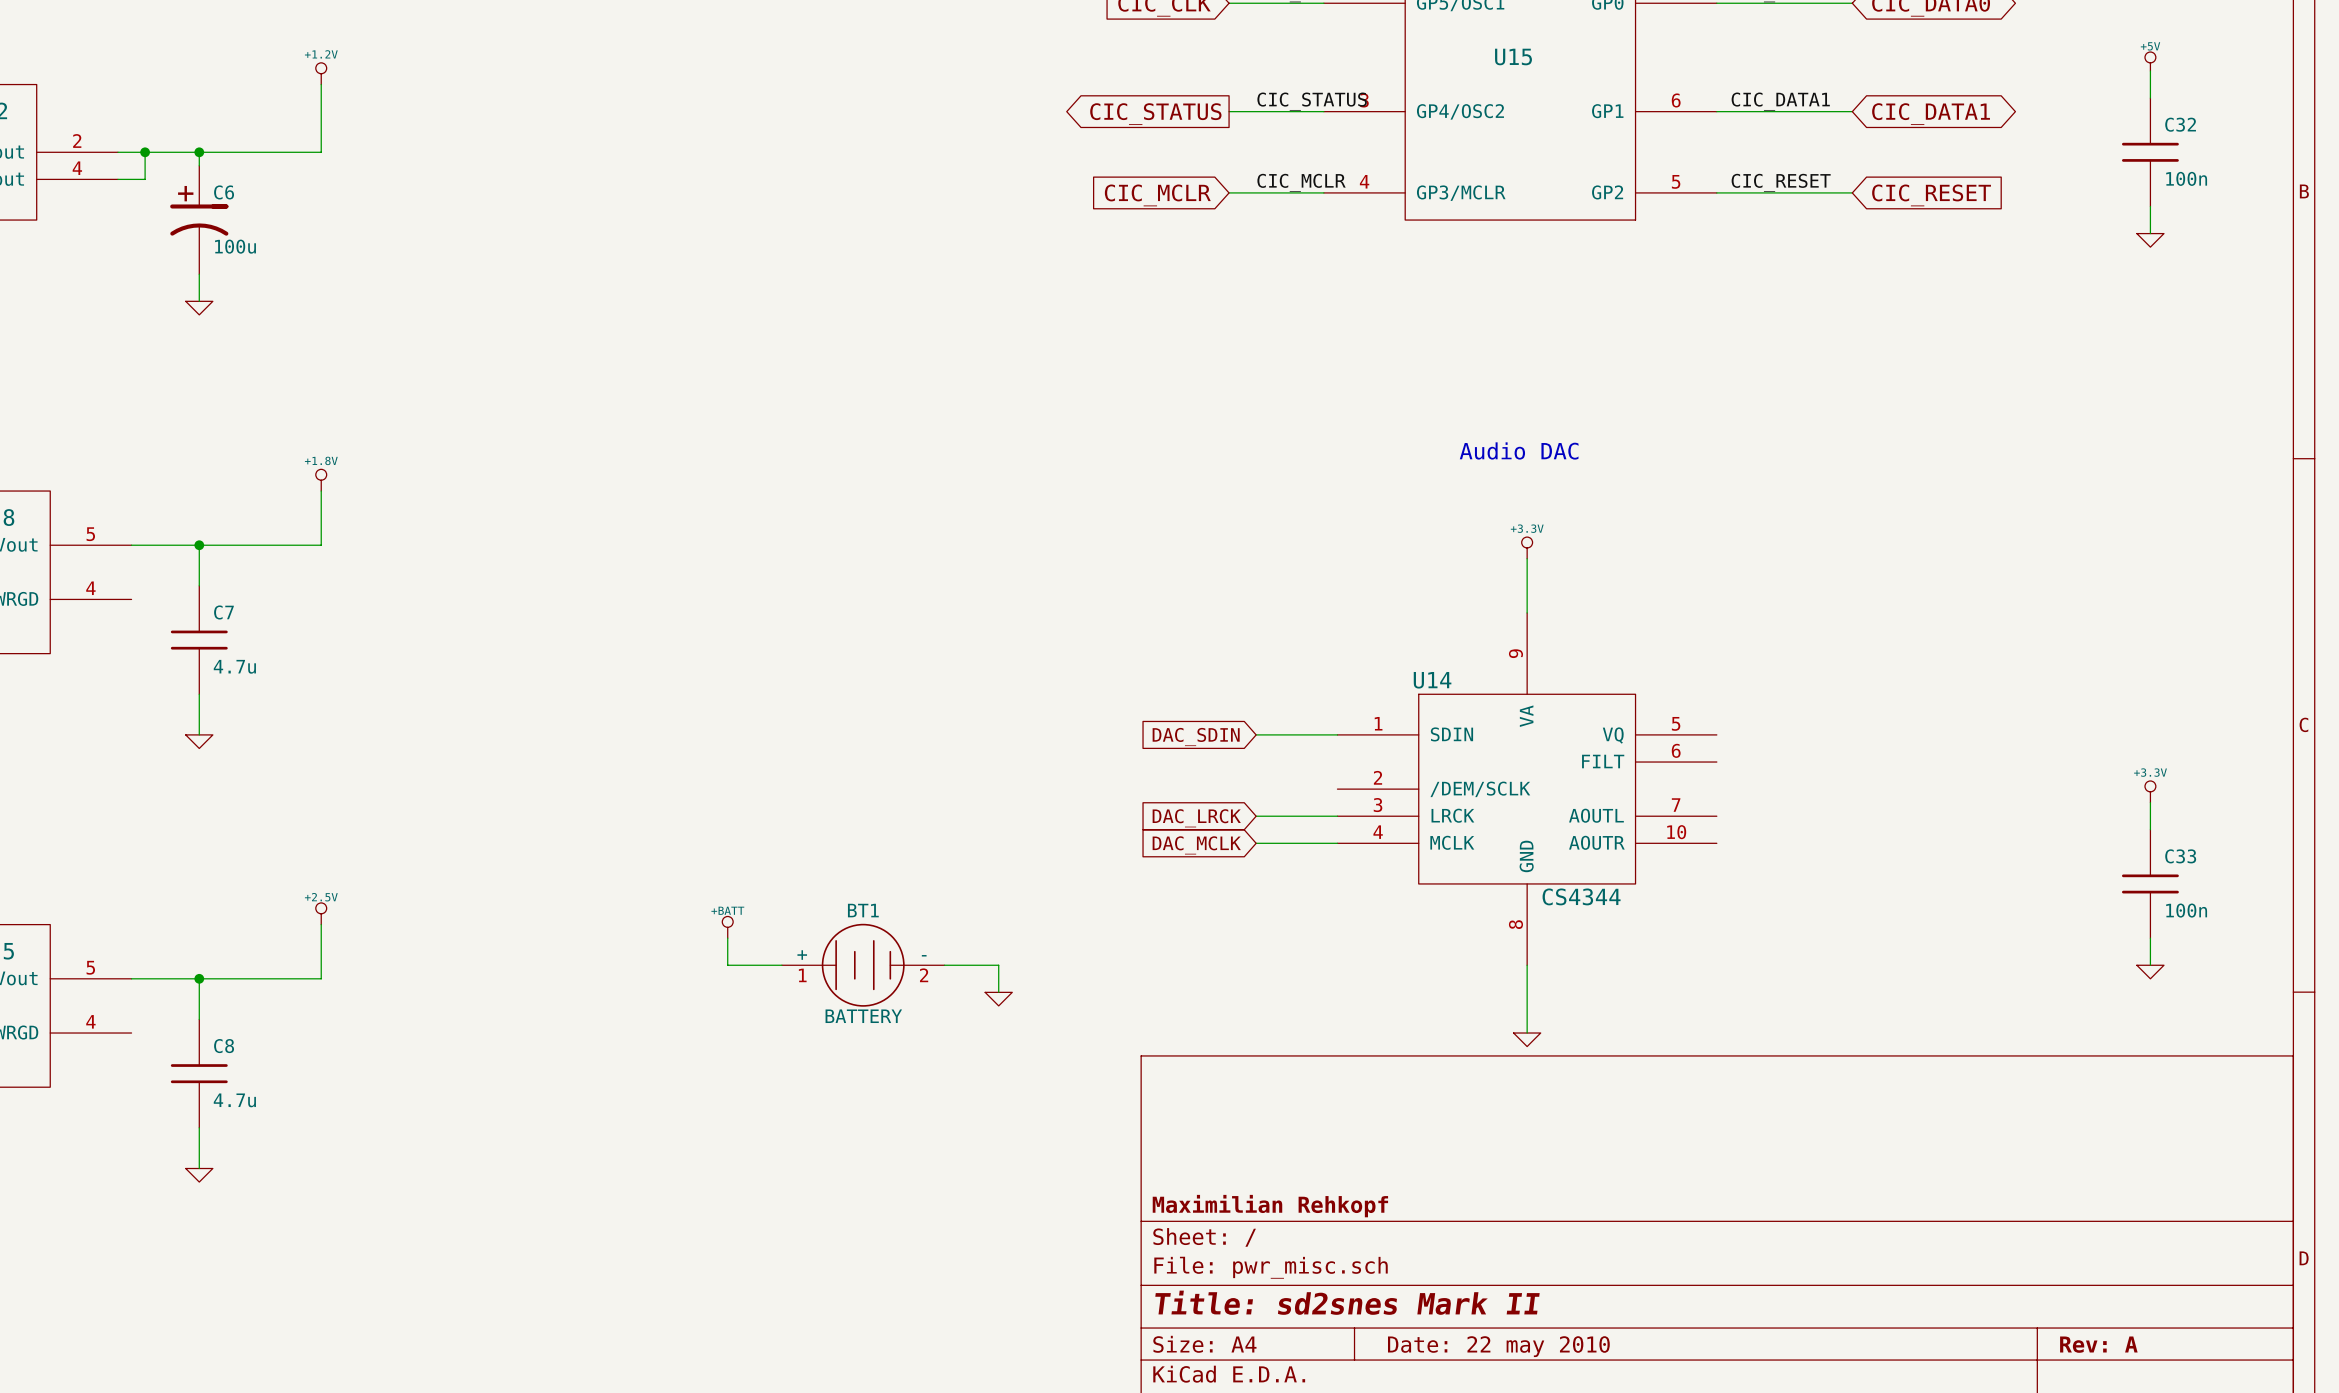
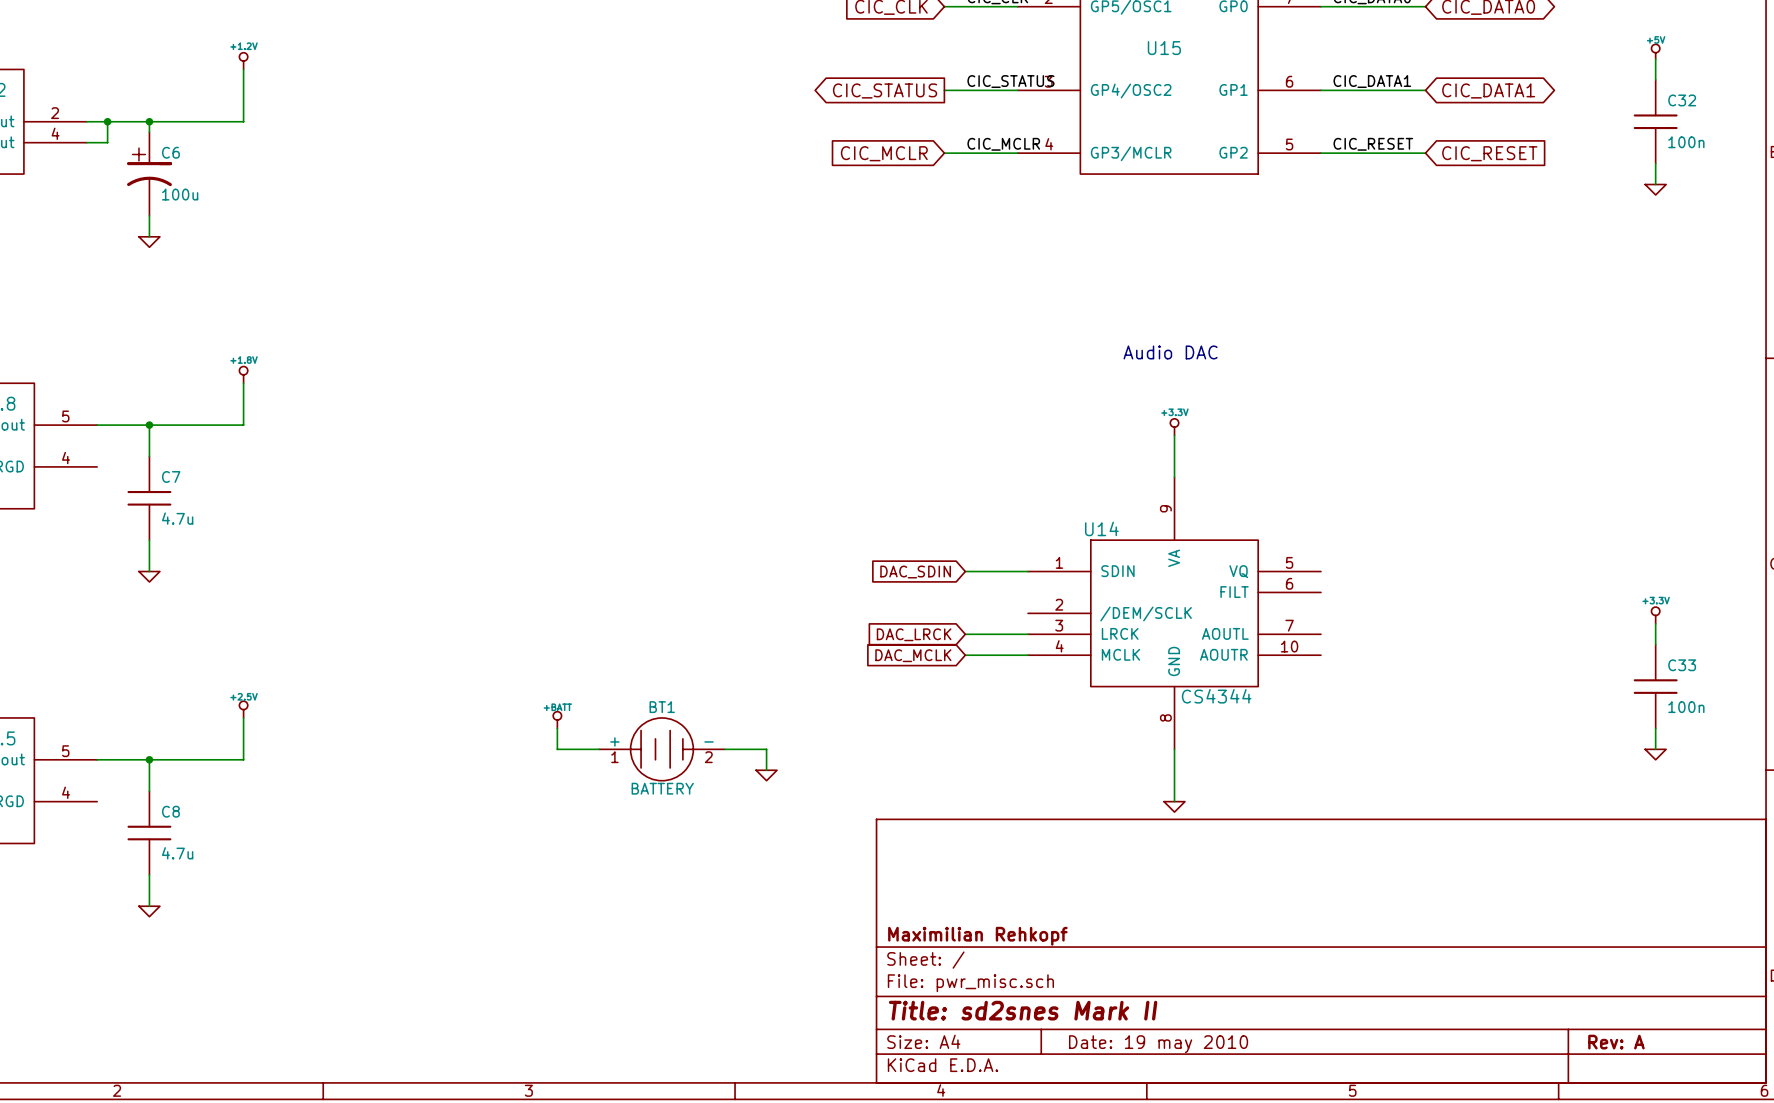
title block: Date: 22 may 2010 (1498, 1346) -> Date: 19 may 2010 (1158, 1044)

